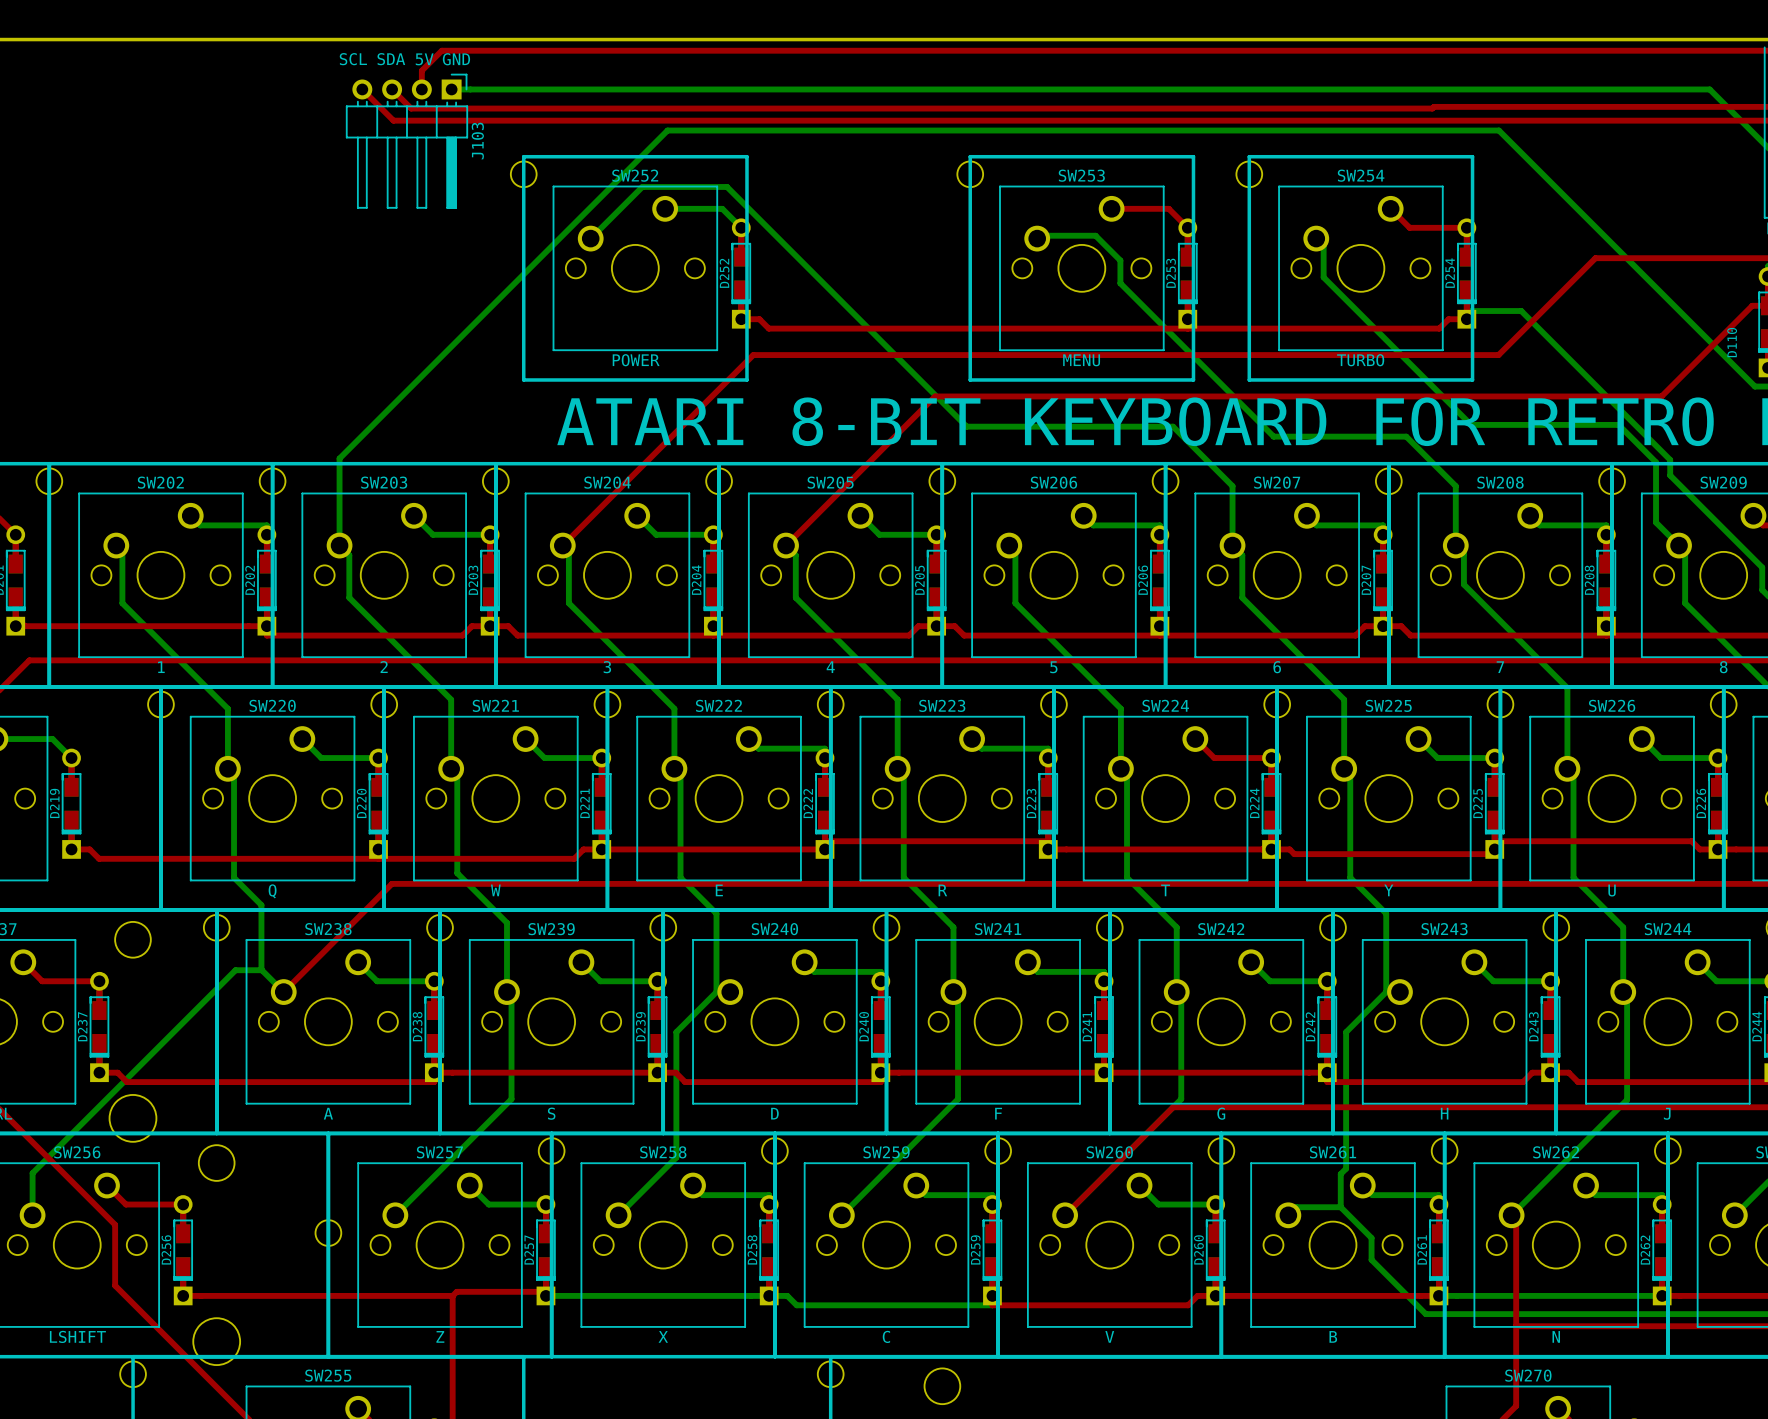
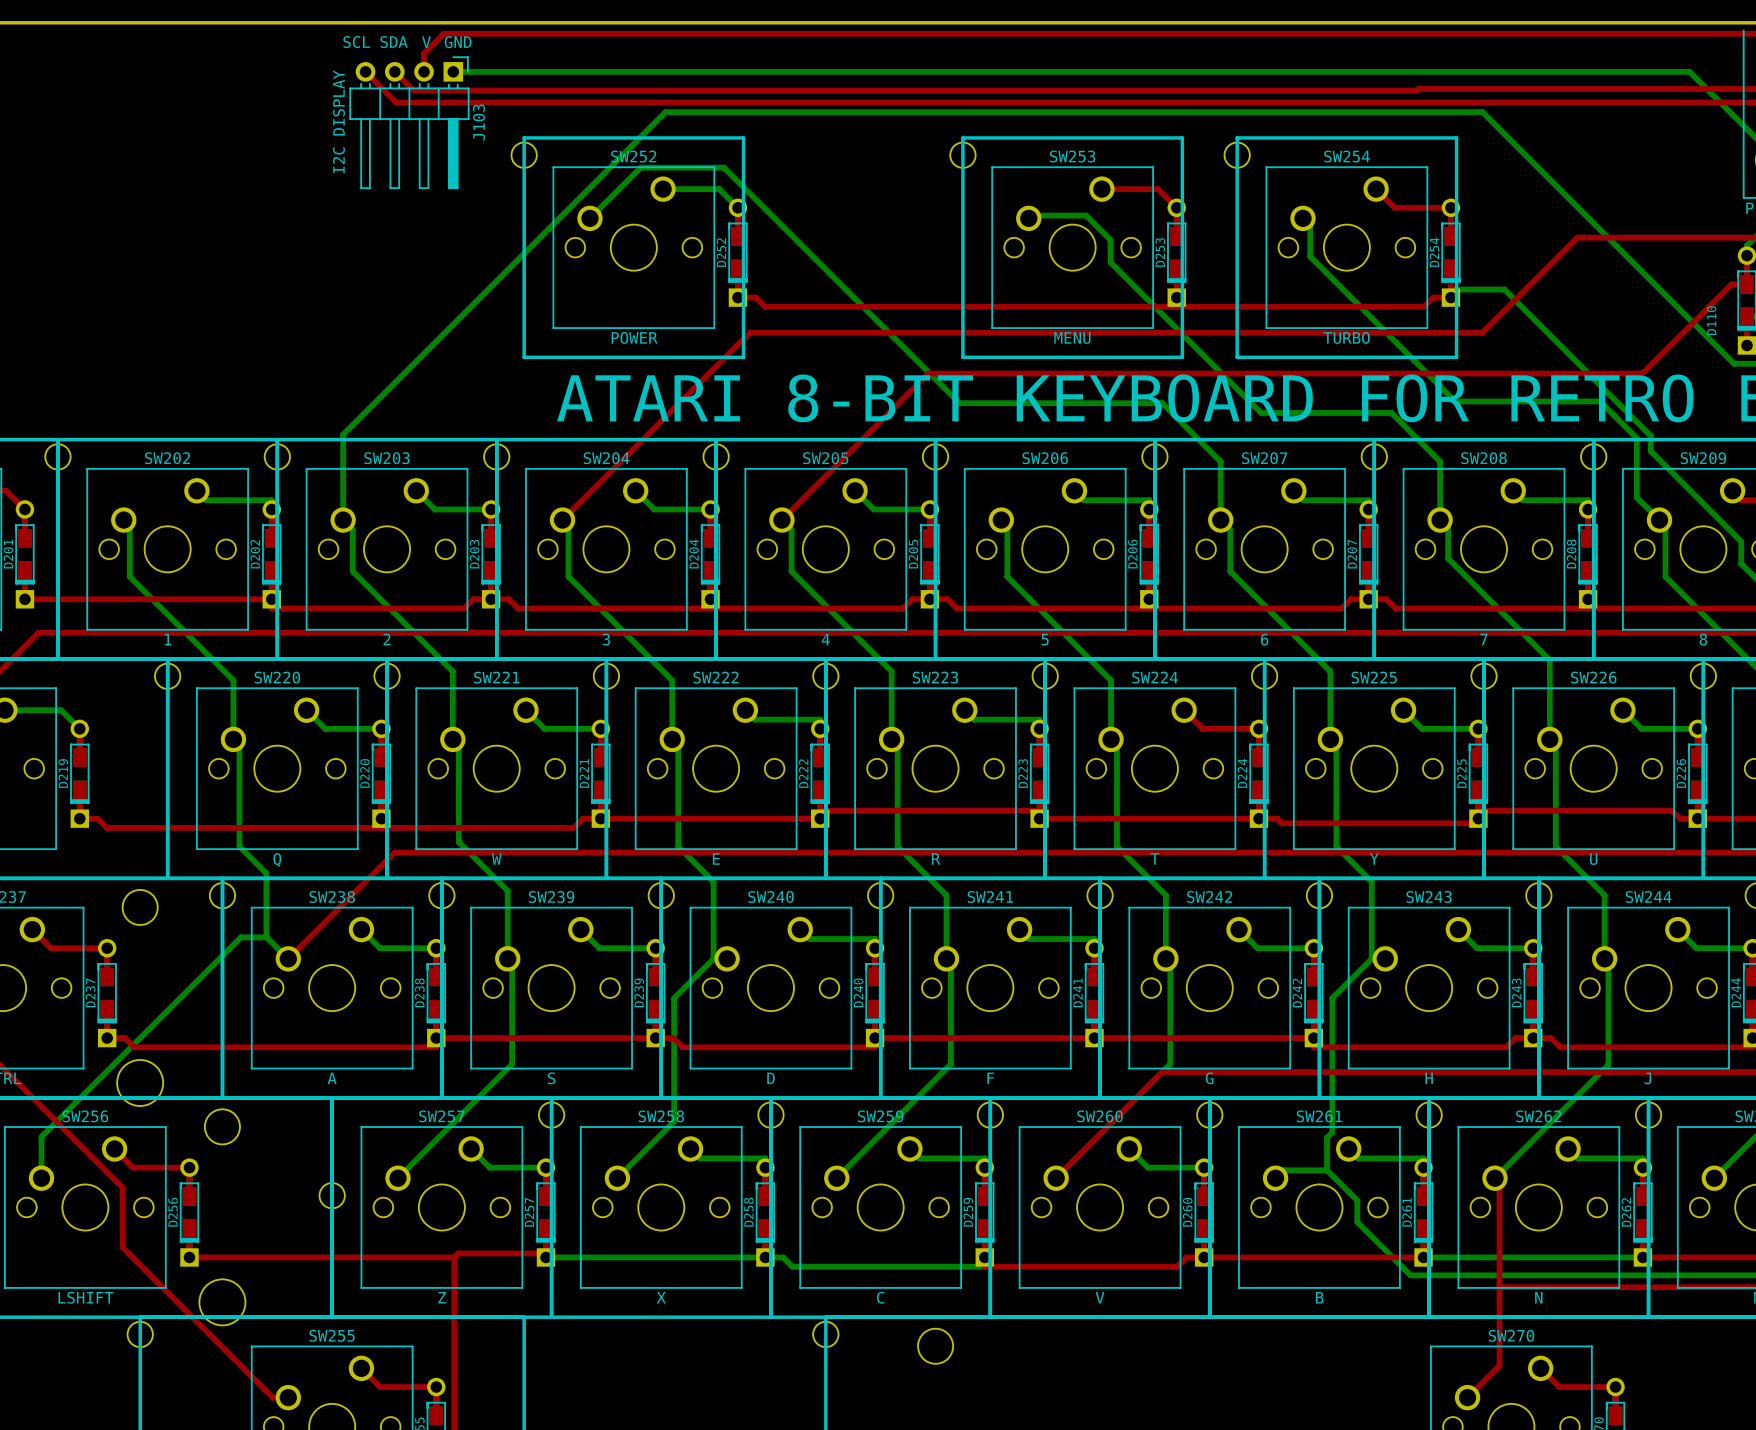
J103 text: 5V (424, 59) -> V (426, 42)
J103 value: none -> I2C DISPLAY (338, 121)

